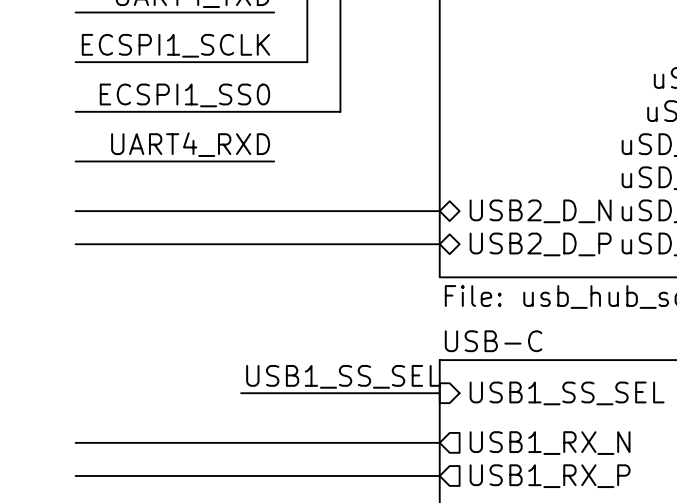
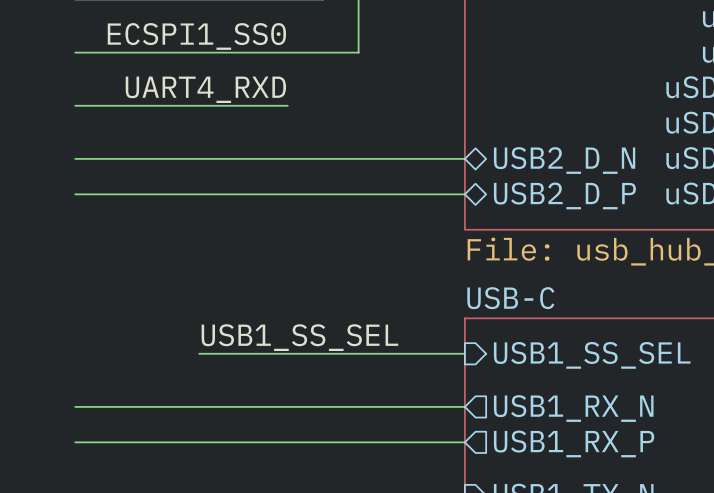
label position: USB1_SS_SEL (343, 376) -> USB1_SS_SEL (299, 337)
wire: none -> (199, 353) (252, 353)

